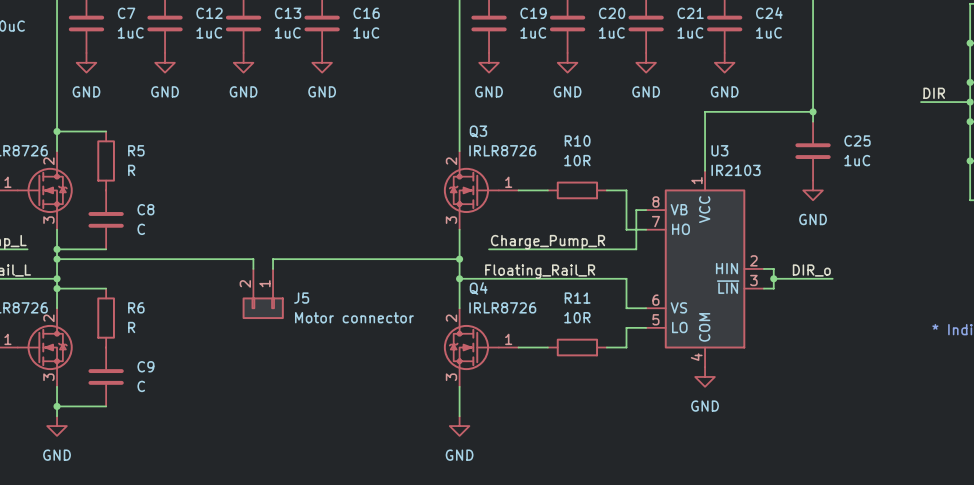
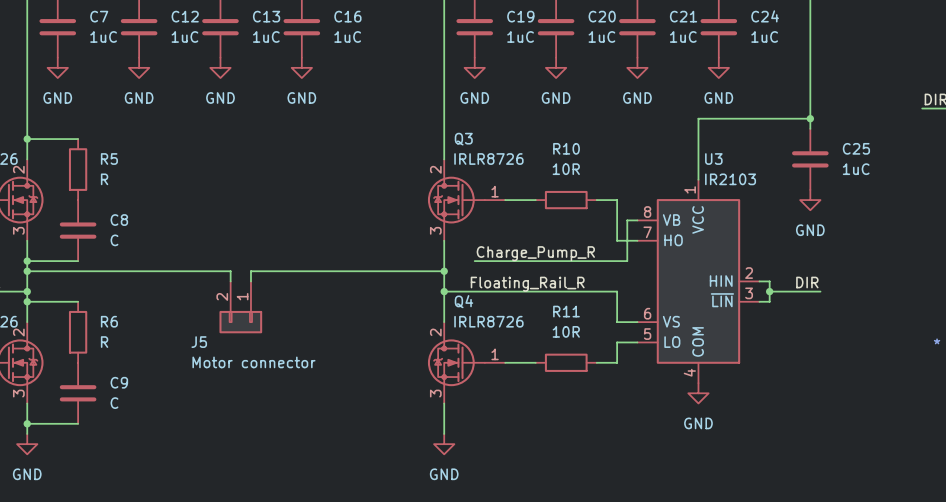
label: DIR_o (811, 270) -> DIR (807, 282)
wire: (822, 278) (832, 278) -> none
J5 name position: J5 (301, 298) -> J5 (199, 342)
J5 value position: Motor connector (354, 317) -> Motor connector (253, 362)

